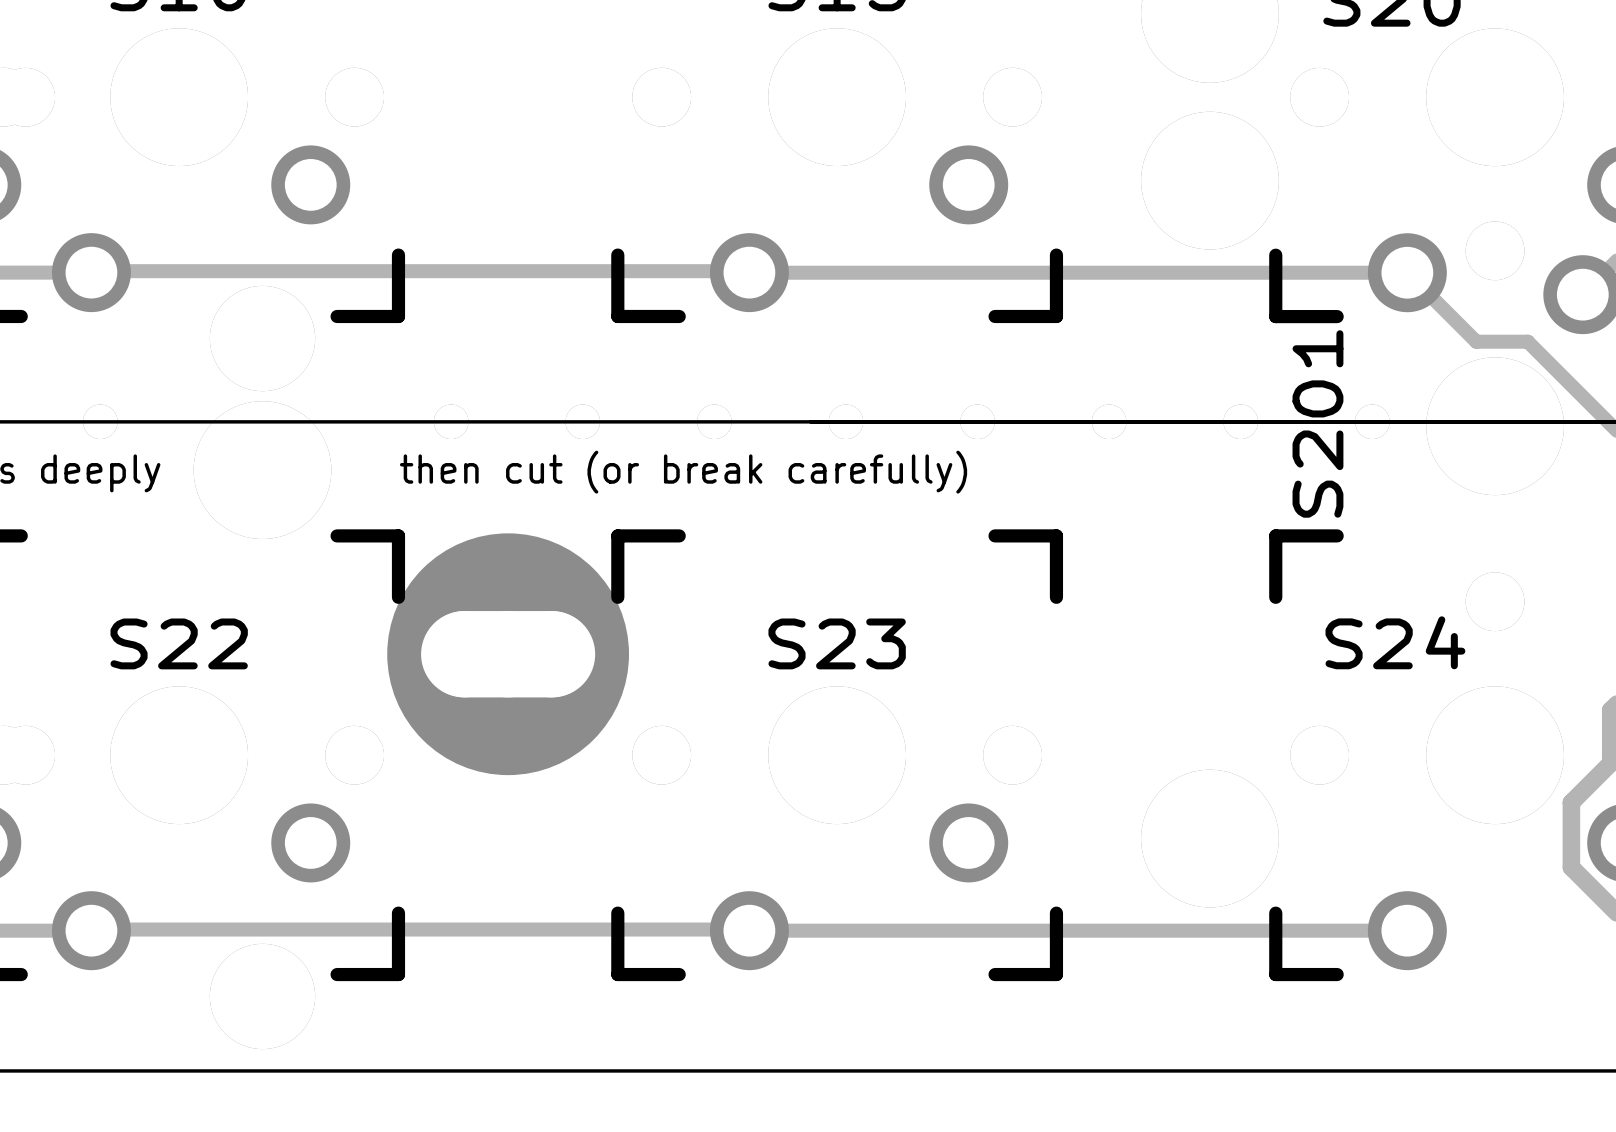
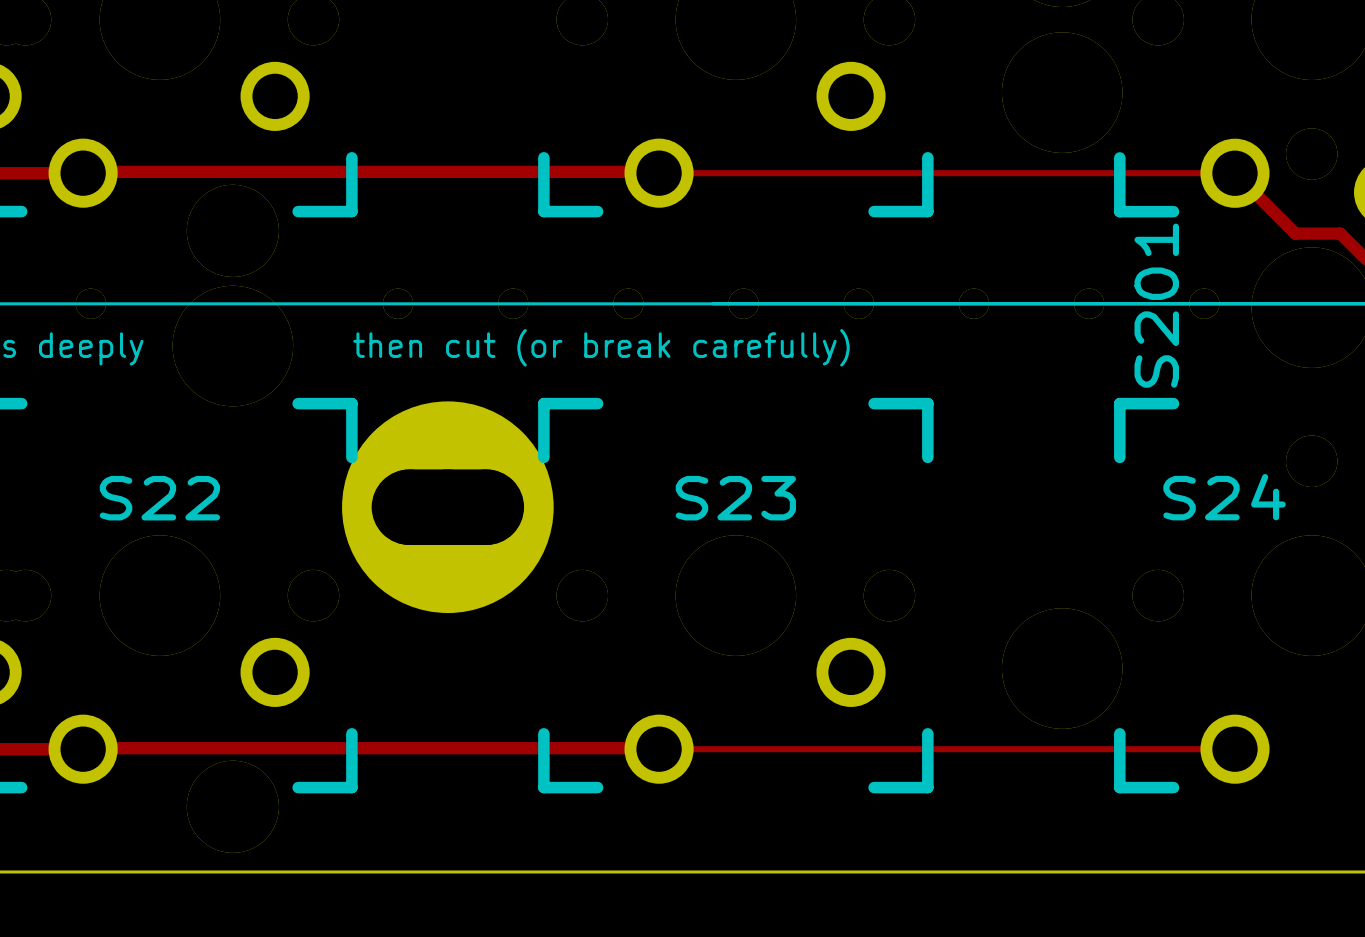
track width: thick (749, 272) (1407, 272) -> thin (659, 173) (1234, 173)
track width: thick (748, 929) (1407, 930) -> thin (658, 748) (1234, 749)

